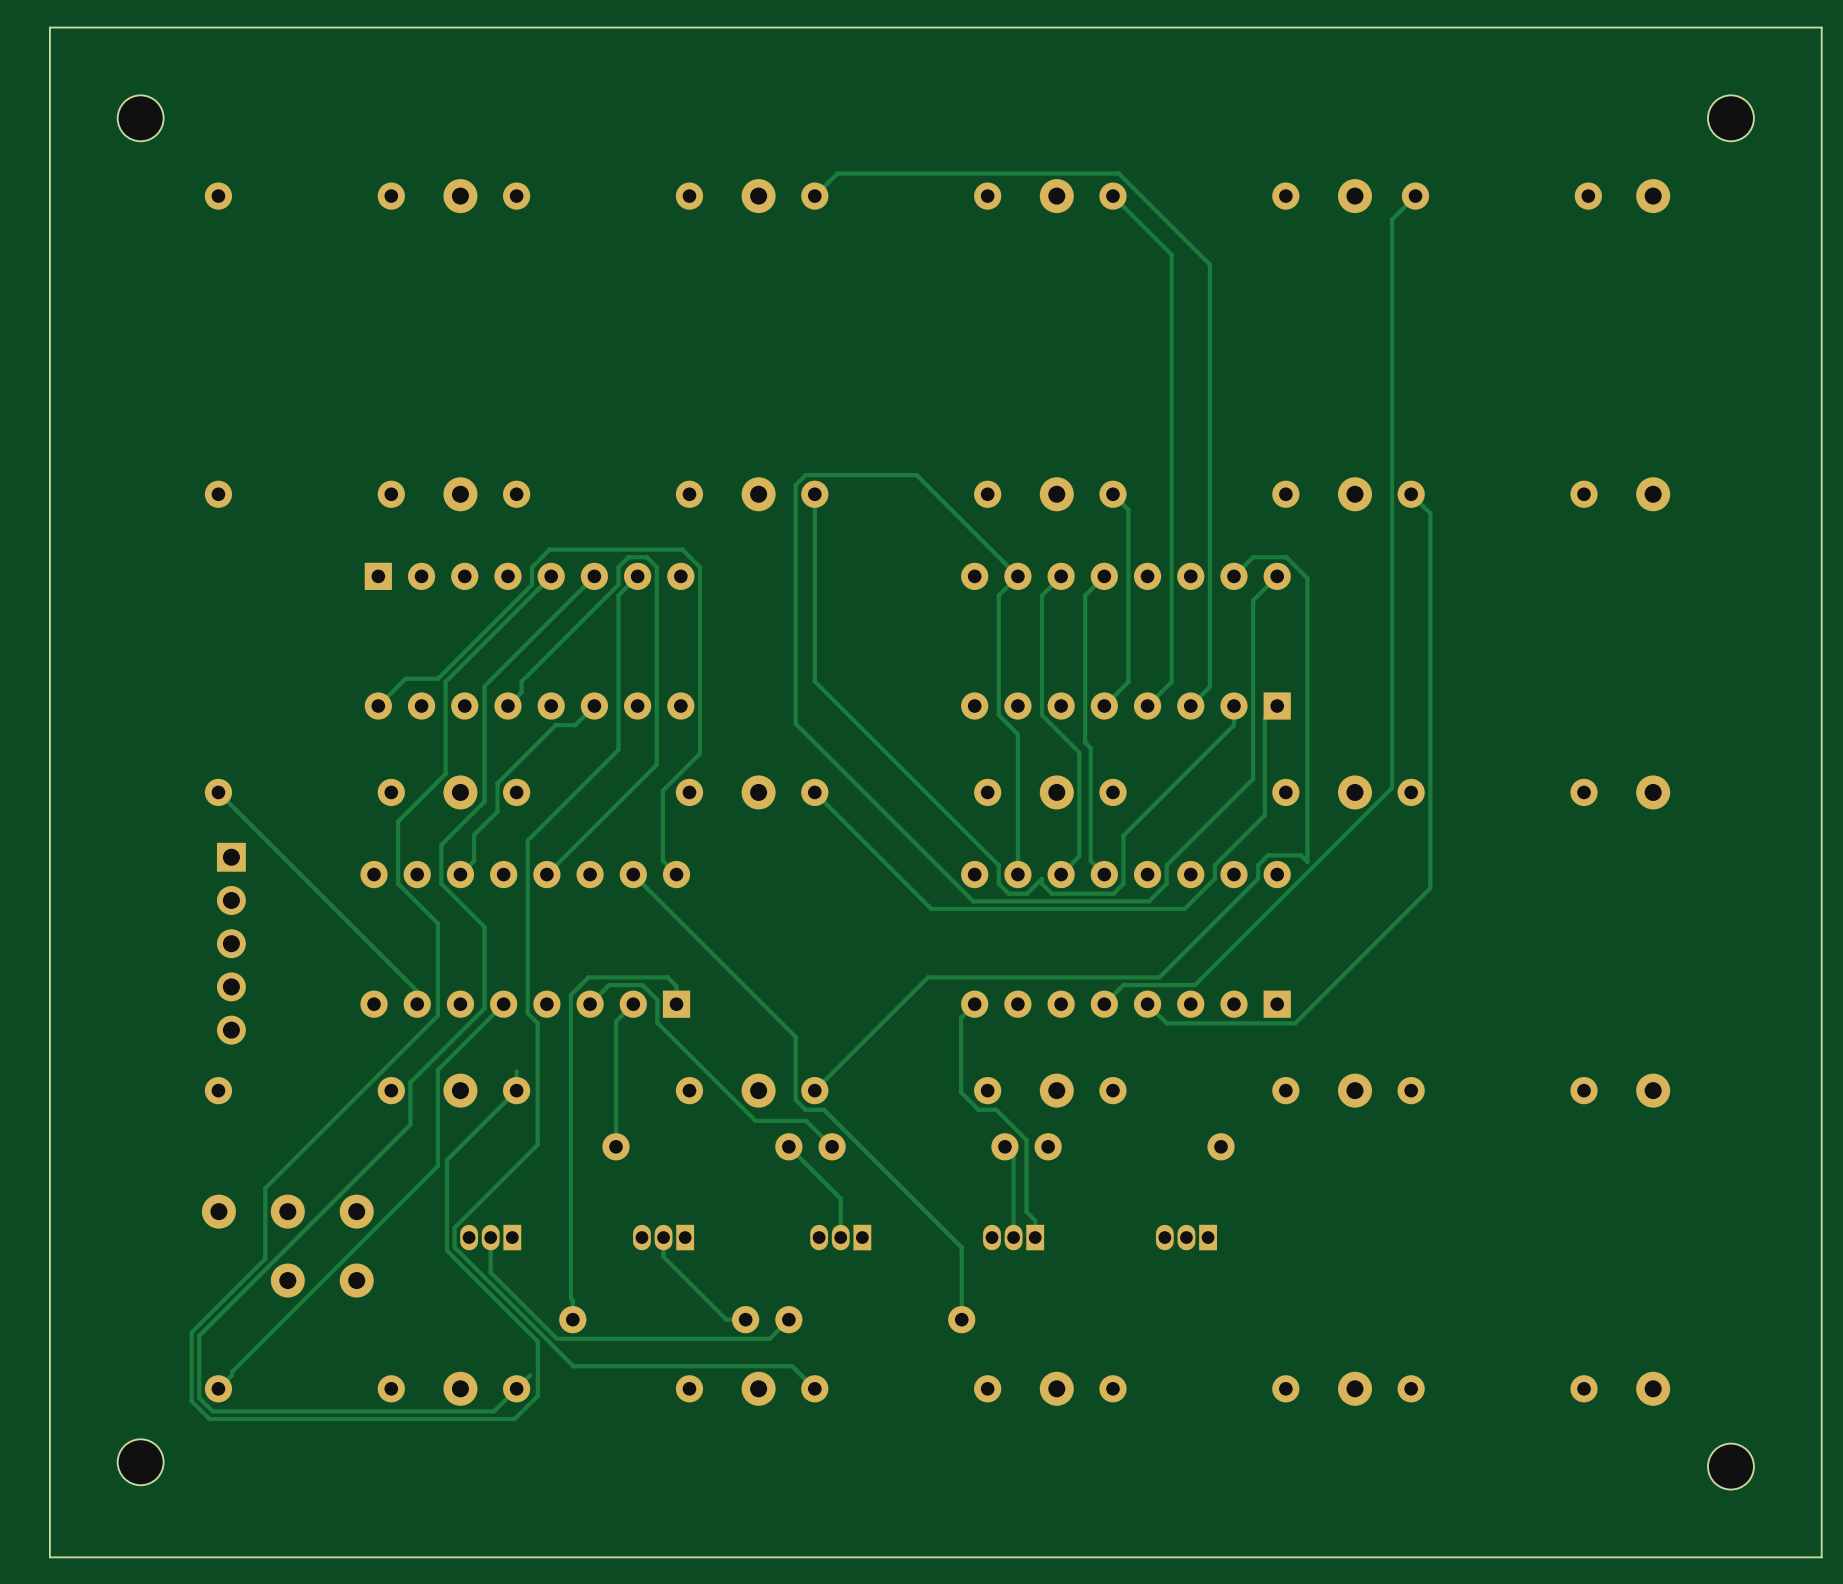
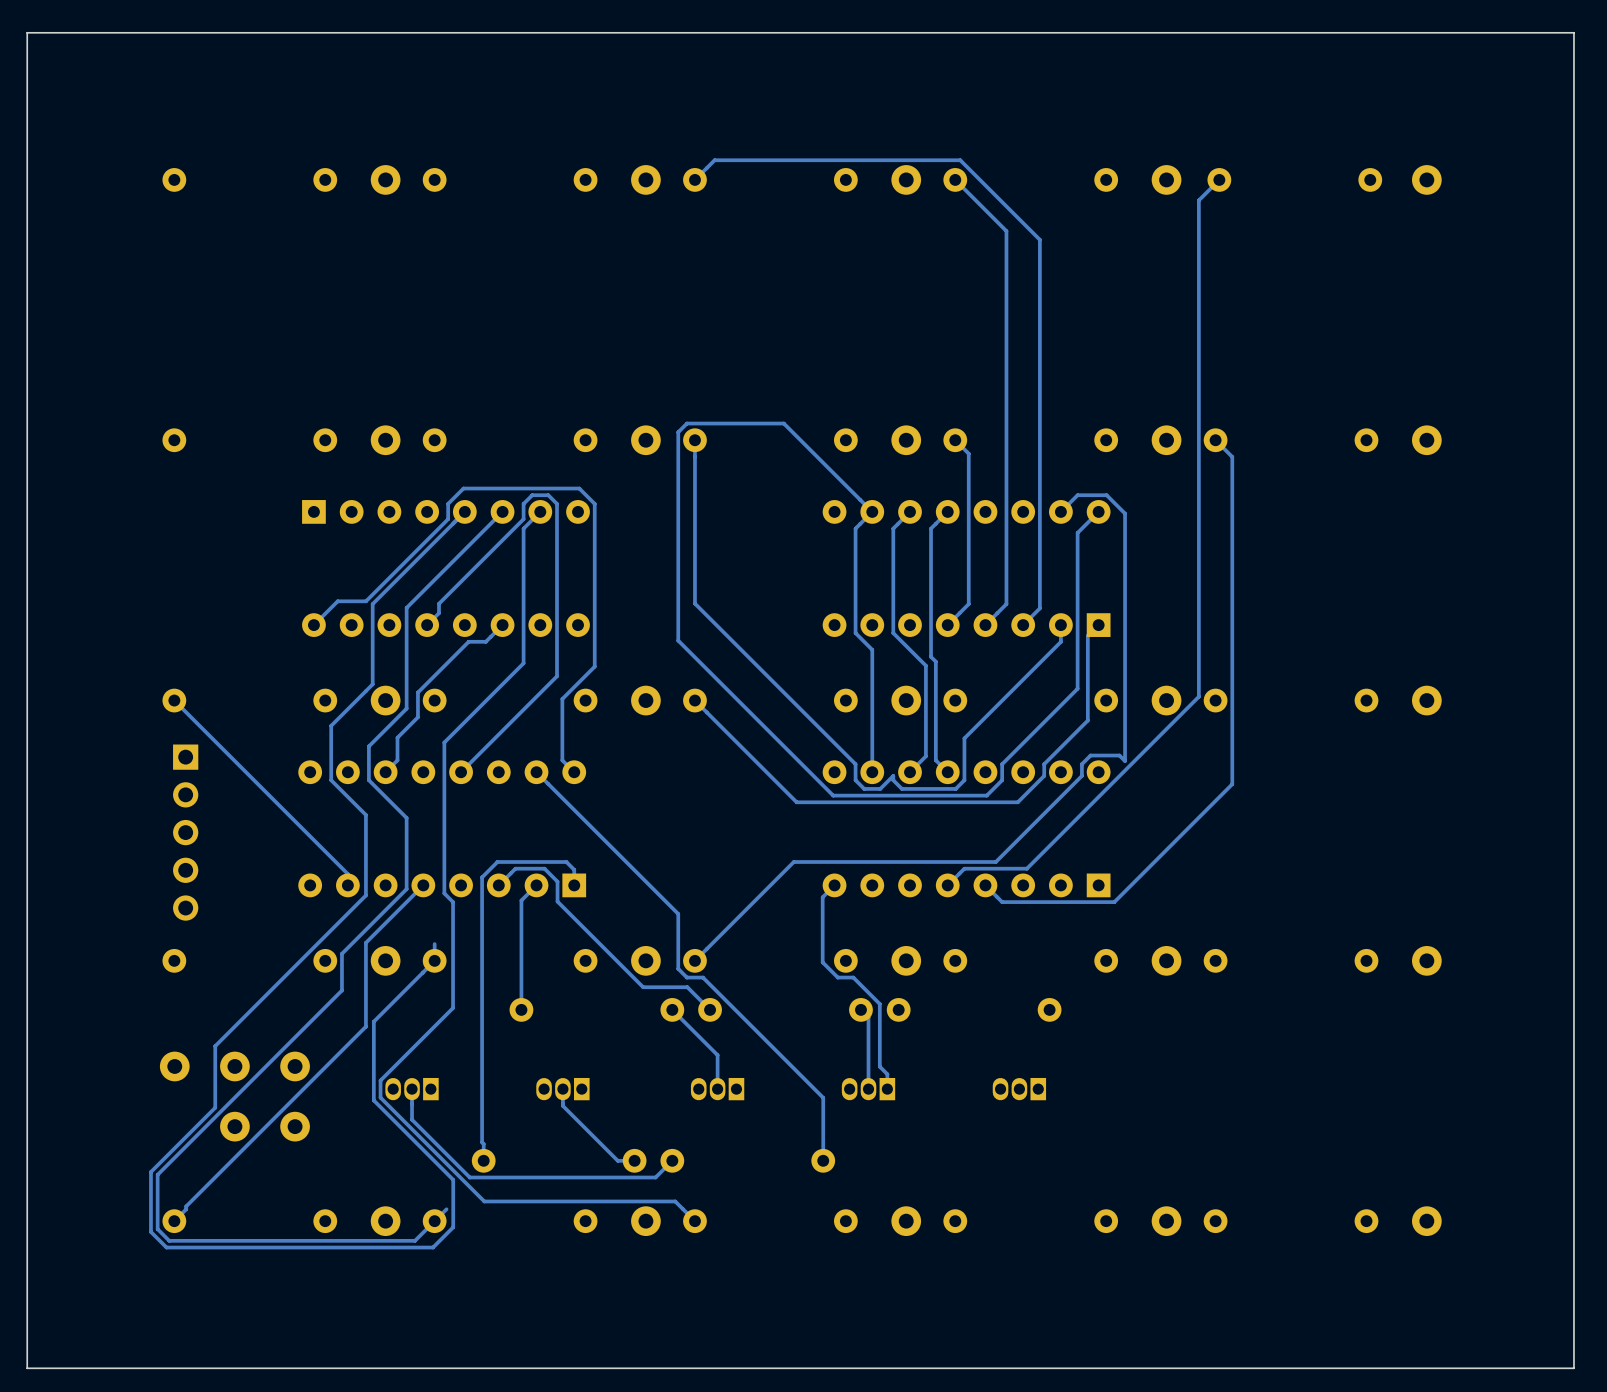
part: (140, 118) -> none
part: (1730, 118) -> none
part: (140, 1462) -> none
part: (1730, 1466) -> none

